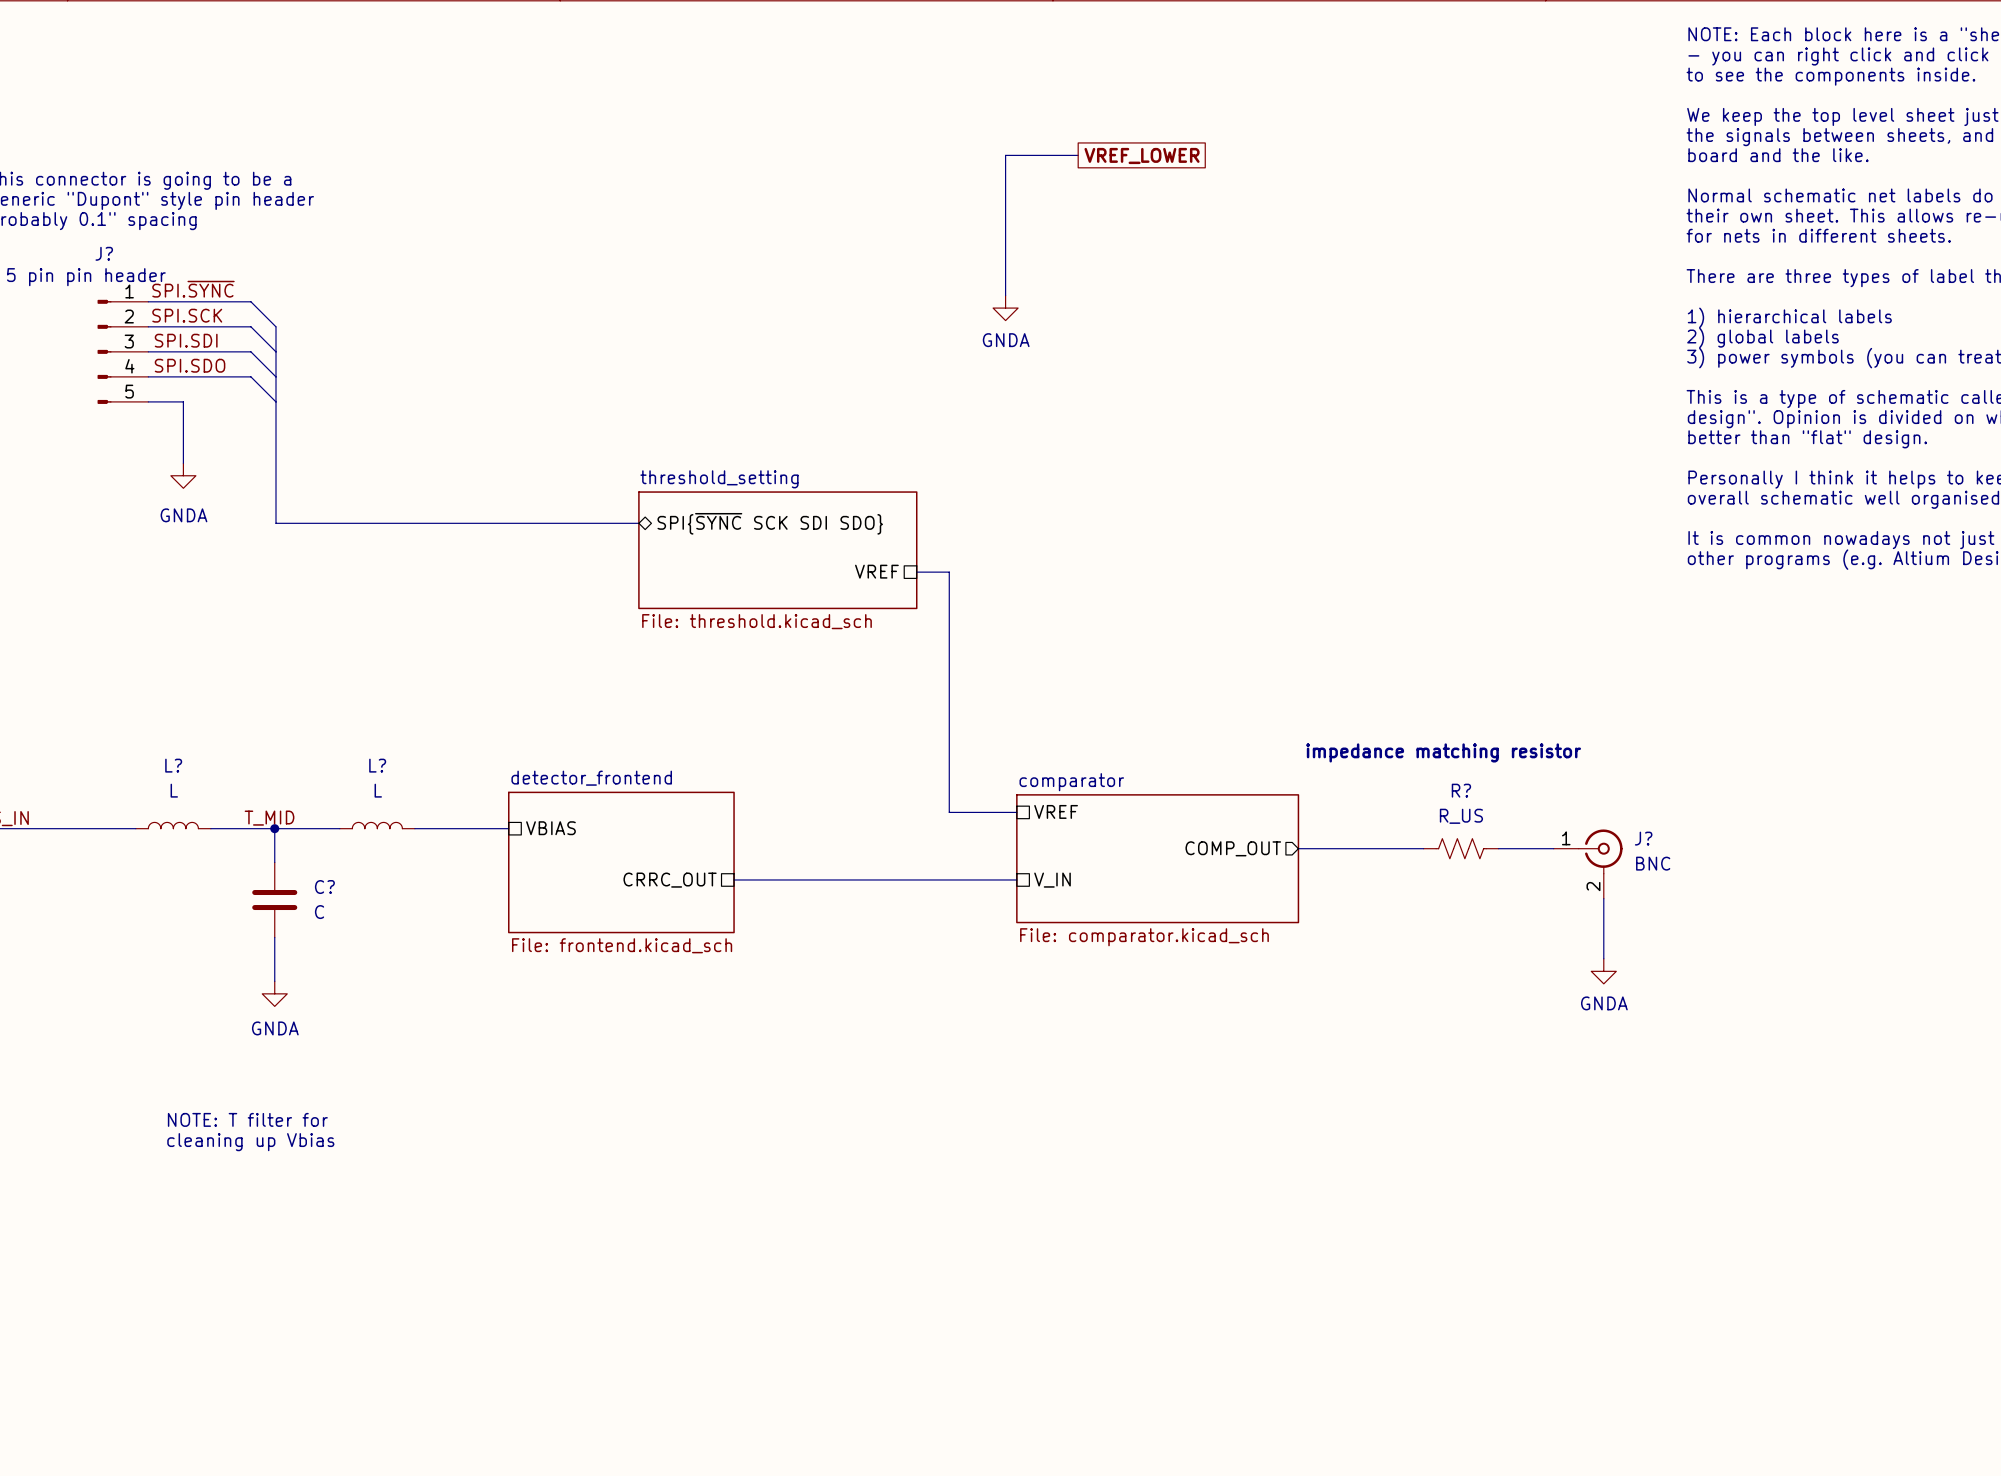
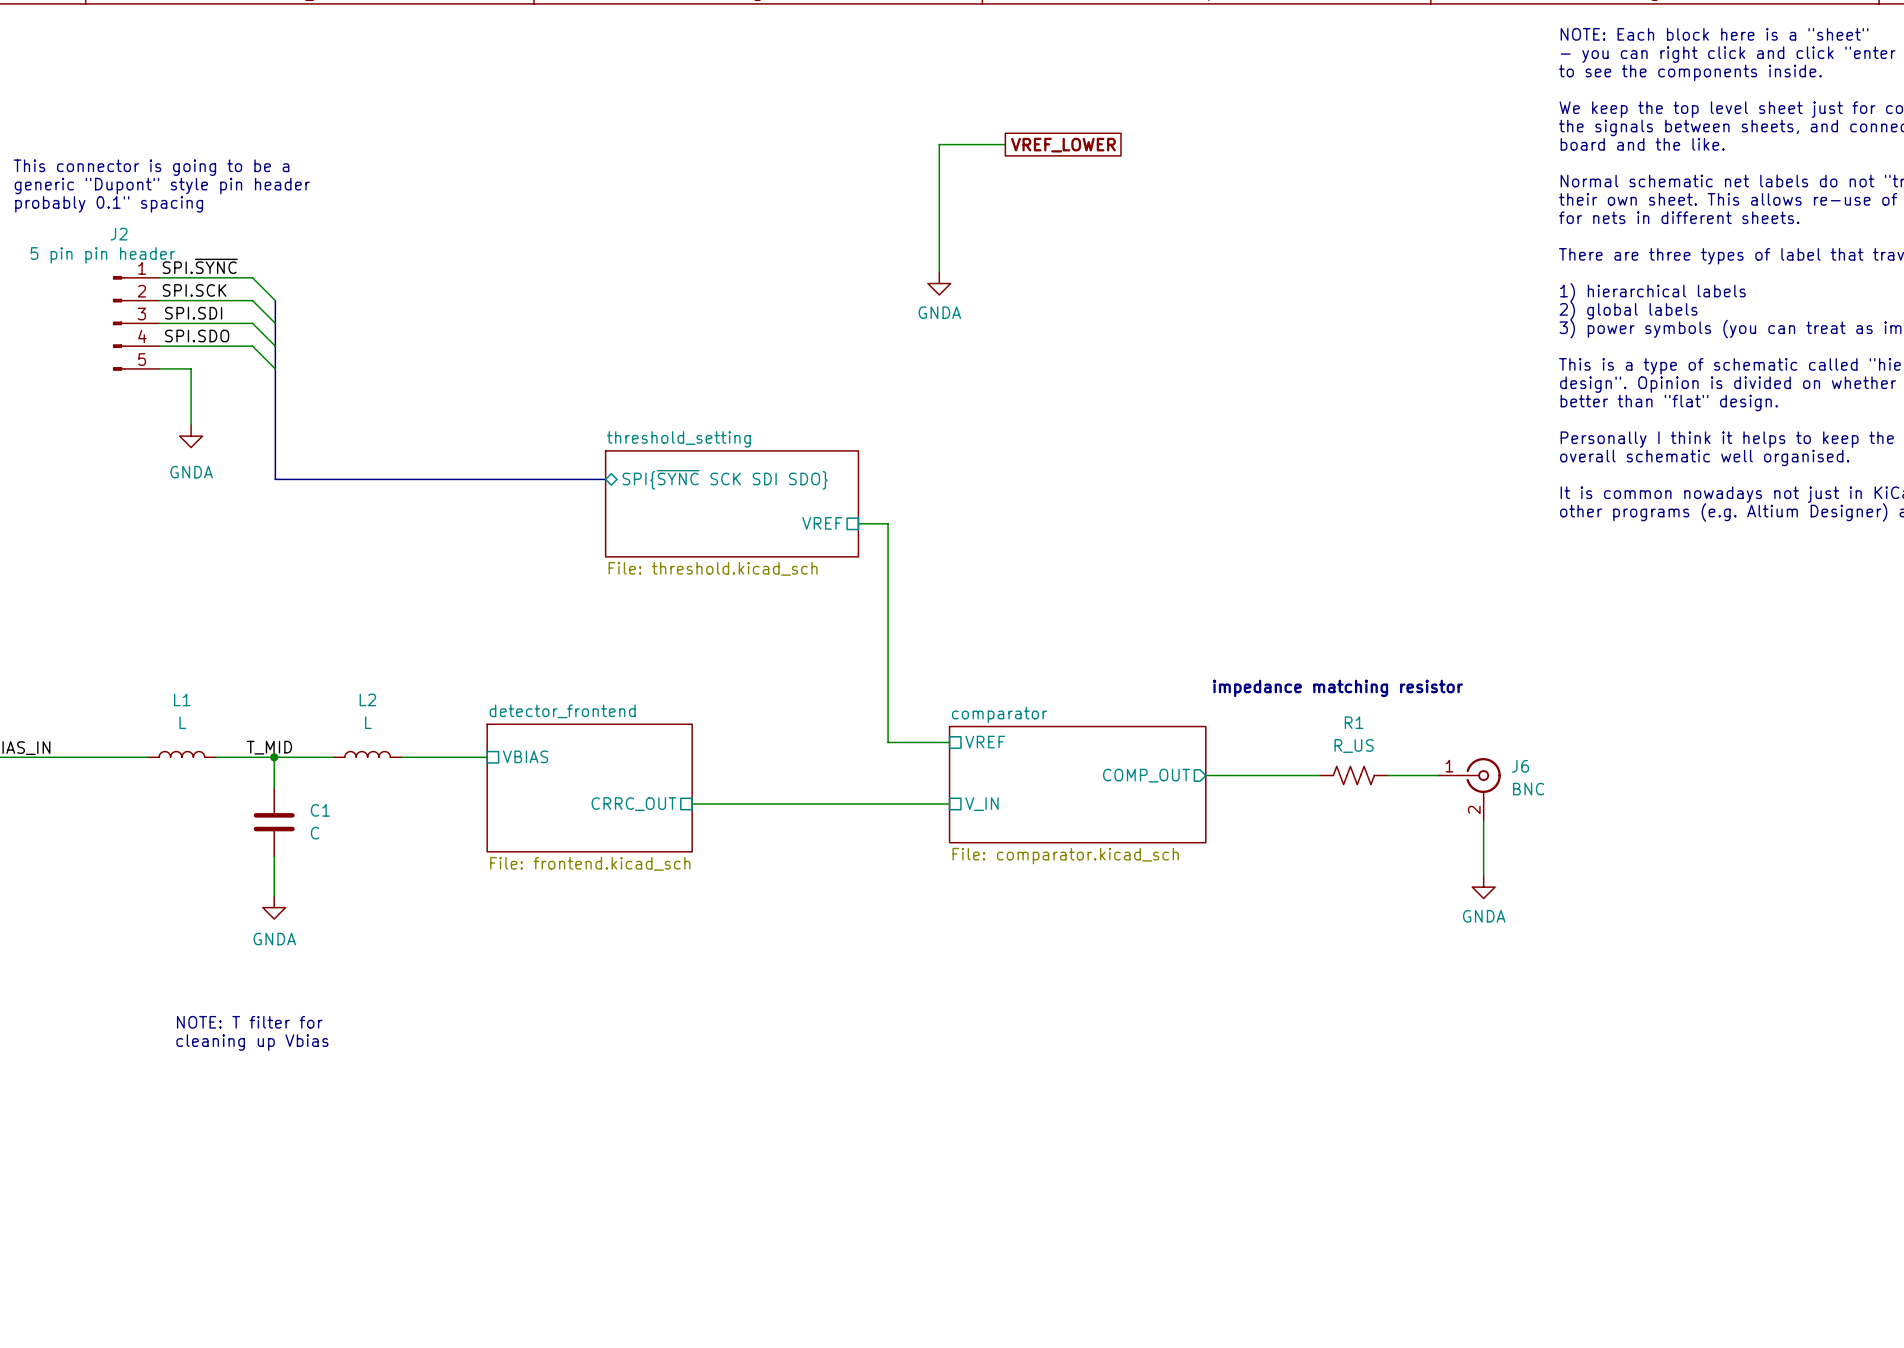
J? name: J? (104, 253) -> J2 (119, 234)
L? name: L? (173, 765) -> L1 (182, 699)
L? name: L? (377, 765) -> L2 (367, 699)
R? name: R? (1461, 790) -> R1 (1354, 722)
J? name: J? (1643, 838) -> J6 (1520, 766)
C? name: C? (324, 887) -> C1 (320, 810)

